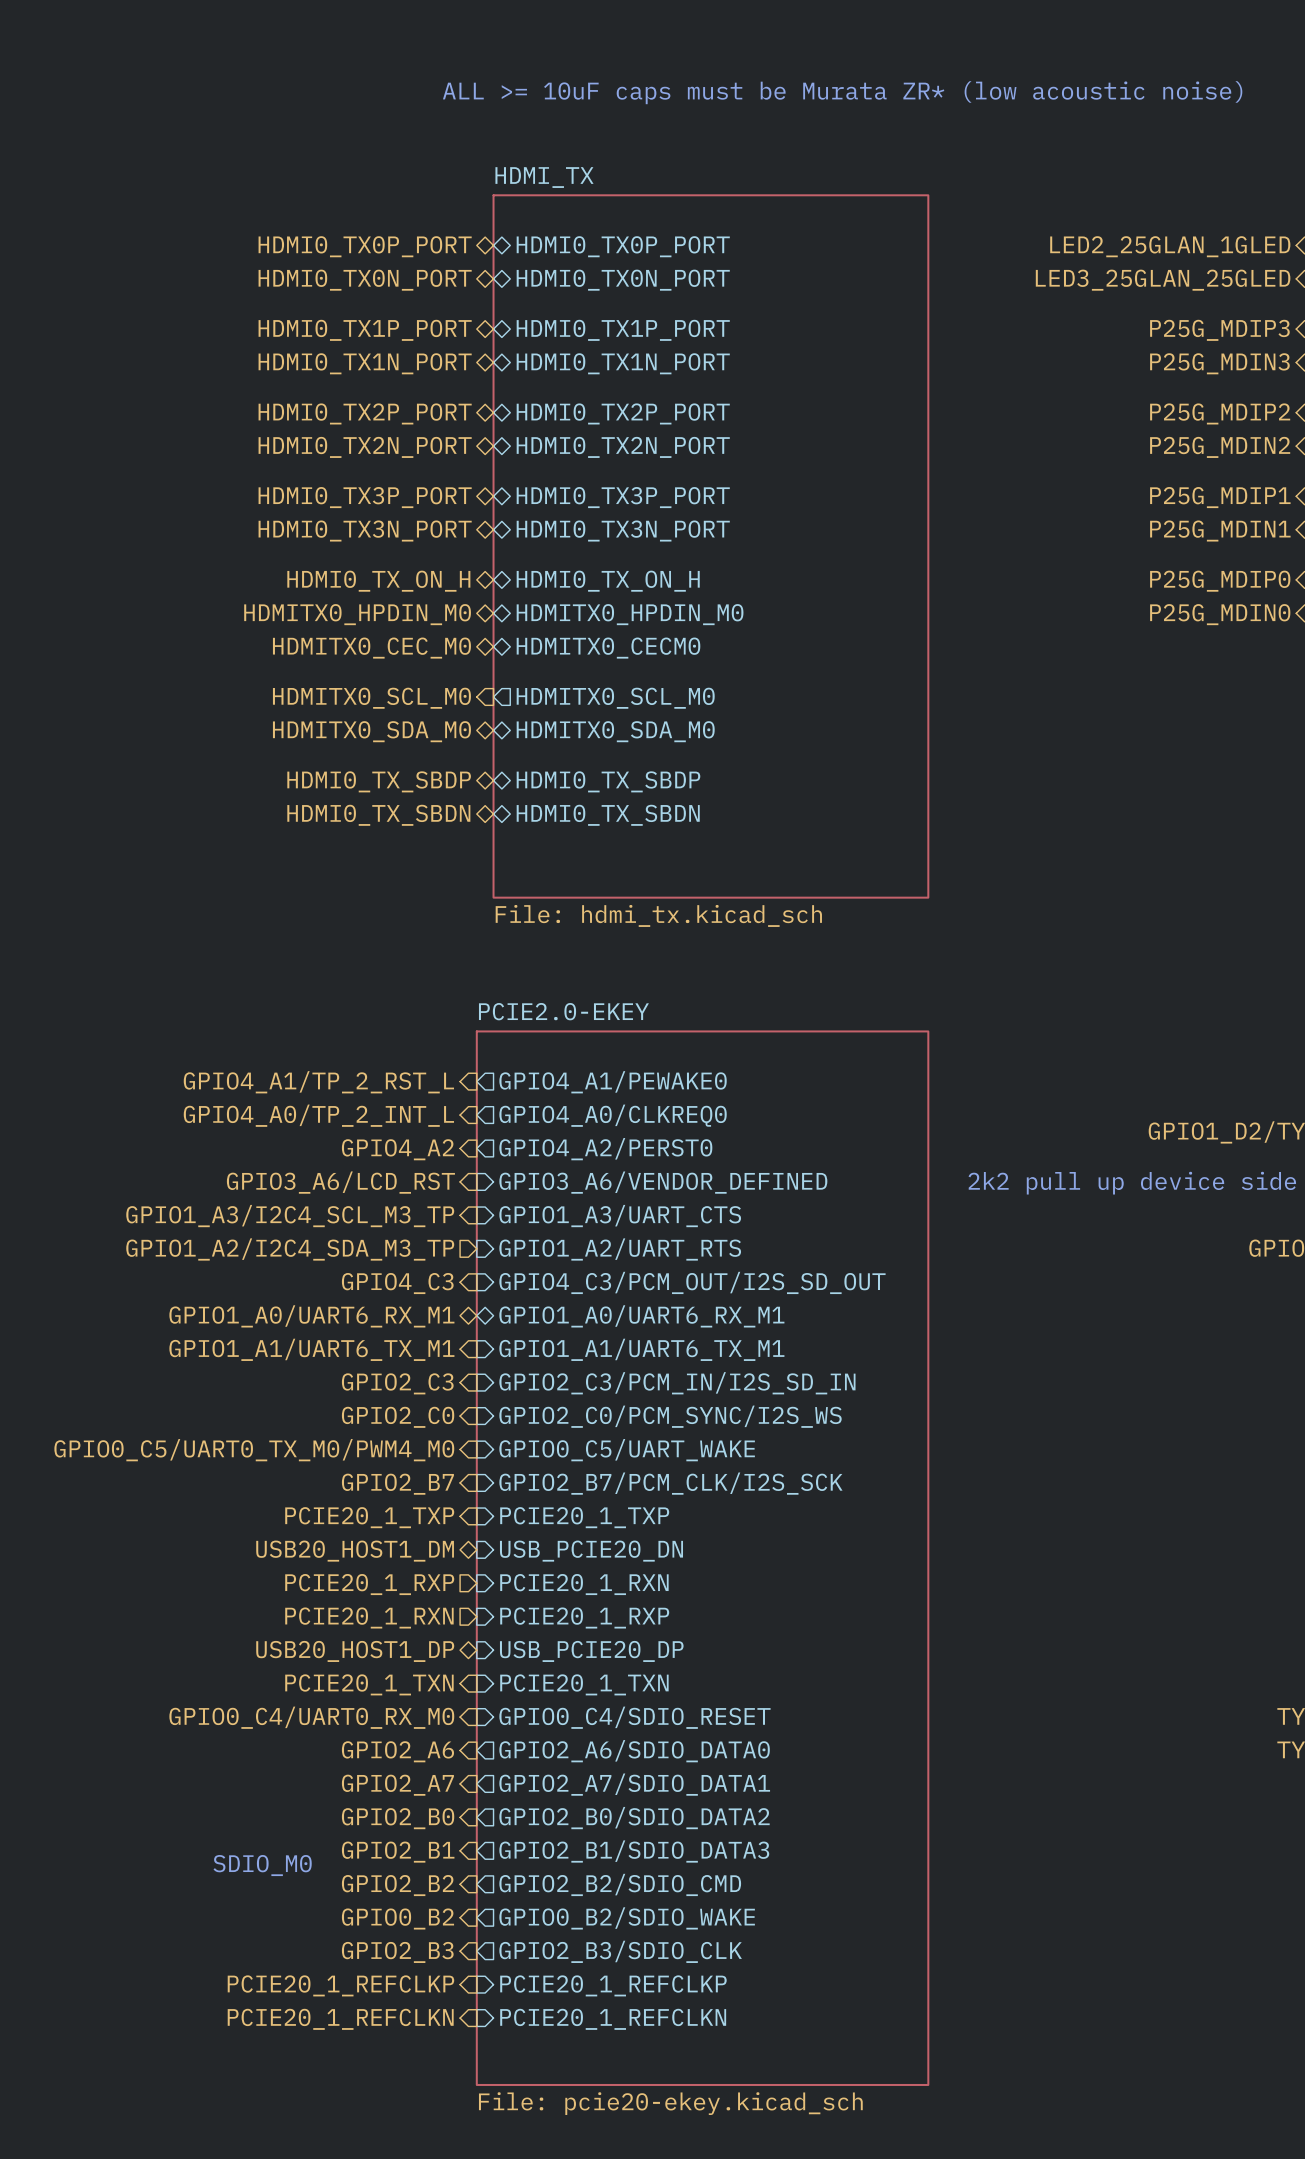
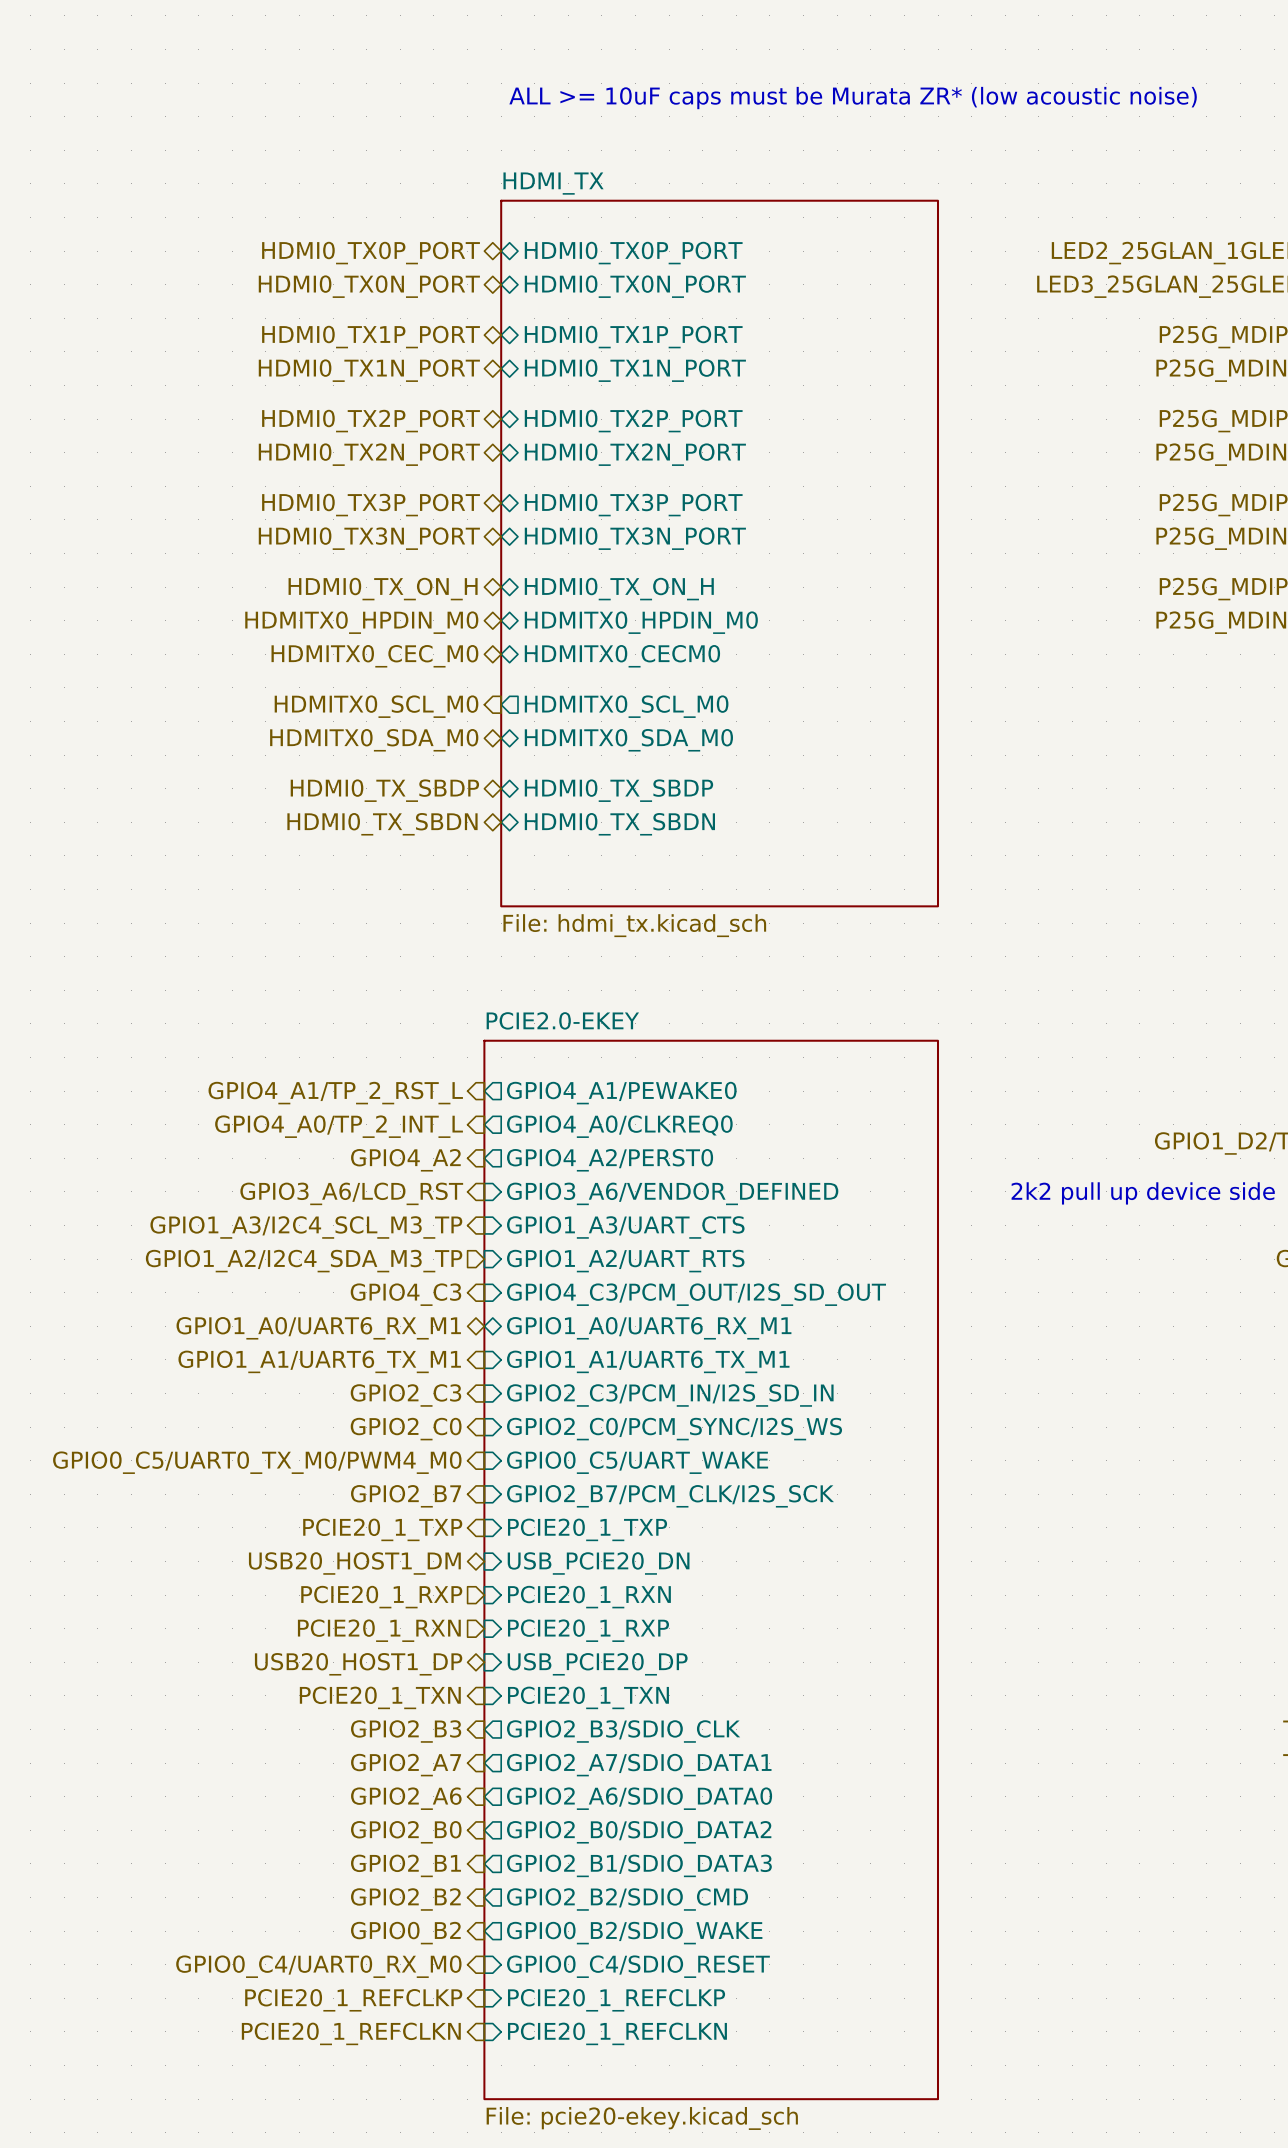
hierarchical label: GPIO0_C4/UART0_RX_M0 (311, 1717) -> GPIO2_B3 (406, 1731)
sheet pin shape: input (634, 1717) -> output (623, 1731)
sheet pin: GPIO0_C4/SDIO_RESET (634, 1717) -> GPIO2_B3/SDIO_CLK (623, 1731)
hierarchical label: GPIO2_A6 (397, 1751) -> GPIO2_A7 (406, 1765)
sheet pin: GPIO2_A6/SDIO_DATA0 (634, 1751) -> GPIO2_A7/SDIO_DATA1 (639, 1765)
sheet pin: GPIO2_A7/SDIO_DATA1 (634, 1784) -> GPIO2_A6/SDIO_DATA0 (639, 1798)
hierarchical label: GPIO2_A7 (397, 1785) -> GPIO2_A6 (406, 1798)
text: SDIO_M0 (262, 1865) -> none
sheet pin shape: output (620, 1951) -> input (638, 1966)
sheet pin: GPIO2_B3/SDIO_CLK (620, 1951) -> GPIO0_C4/SDIO_RESET (638, 1966)
hierarchical label: GPIO2_B3 (397, 1952) -> GPIO0_C4/UART0_RX_M0 (318, 1966)

